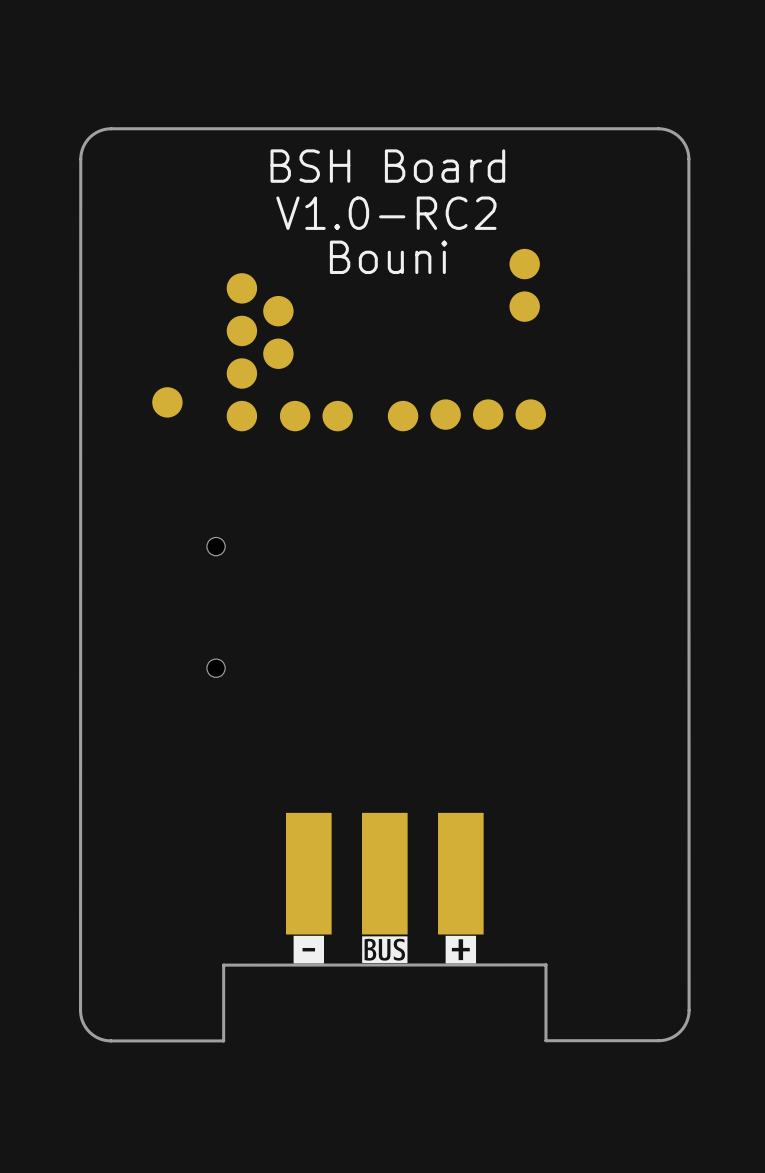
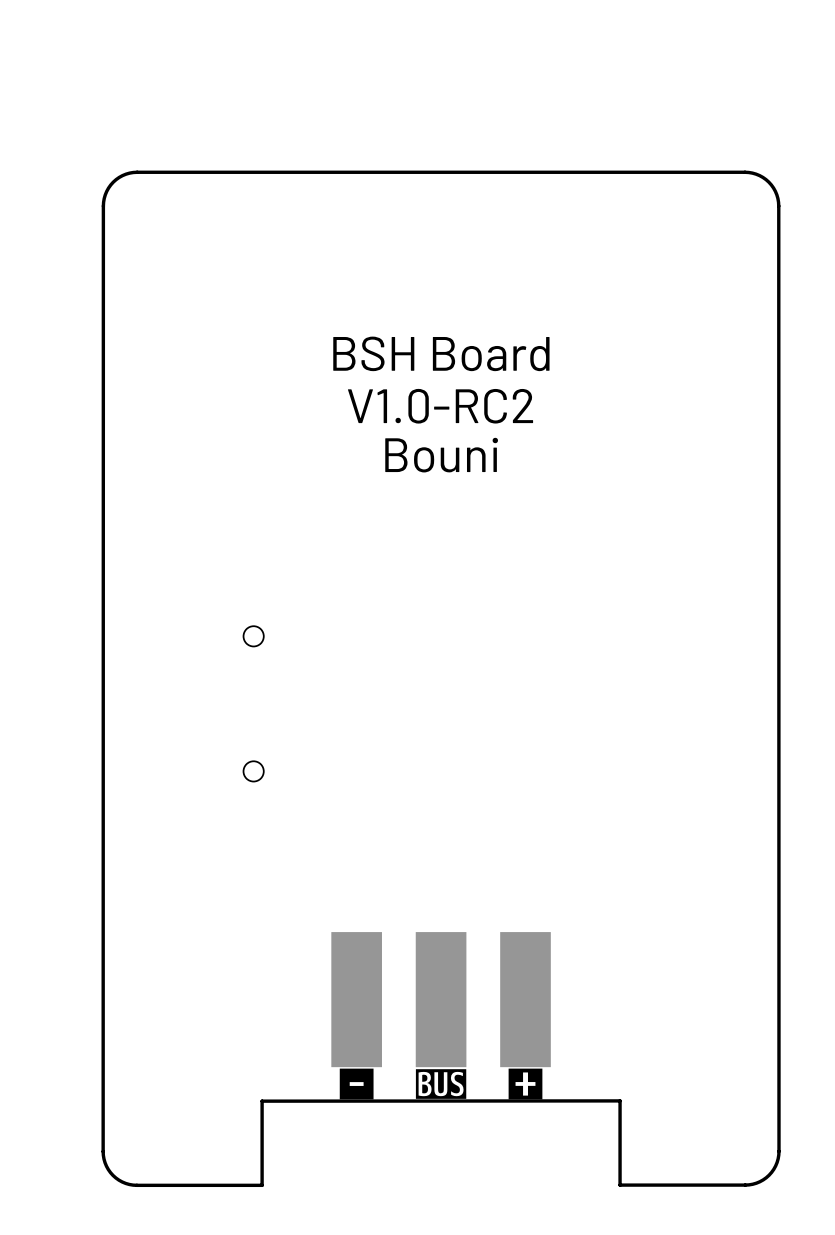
text position: BSH Board (387, 166) -> BSH Board (441, 353)
text position: V1.0-RC2 (386, 213) -> V1.0-RC2 (440, 406)
text position: Bouni (388, 257) -> Bouni (441, 455)
part: (524, 264) -> none
part: (241, 288) -> none
part: (524, 306) -> none
part: (278, 311) -> none
part: (241, 330) -> none
part: (278, 353) -> none
part: (241, 373) -> none
part: (167, 402) -> none
part: (445, 414) -> none
part: (488, 414) -> none
part: (530, 414) -> none
part: (241, 416) -> none
part: (295, 416) -> none
part: (337, 416) -> none
part: (403, 416) -> none

